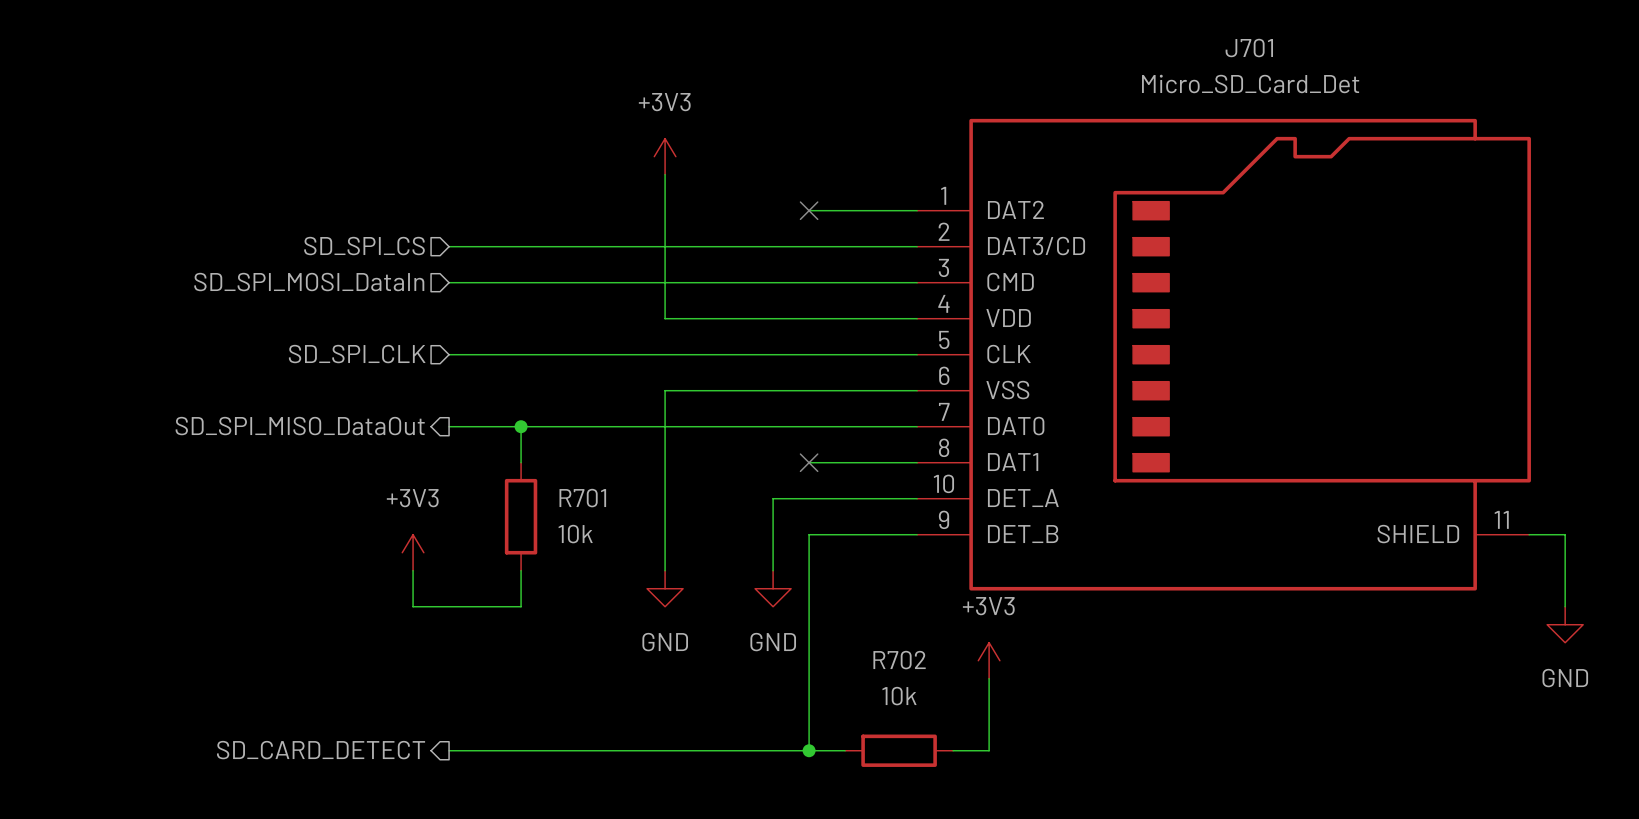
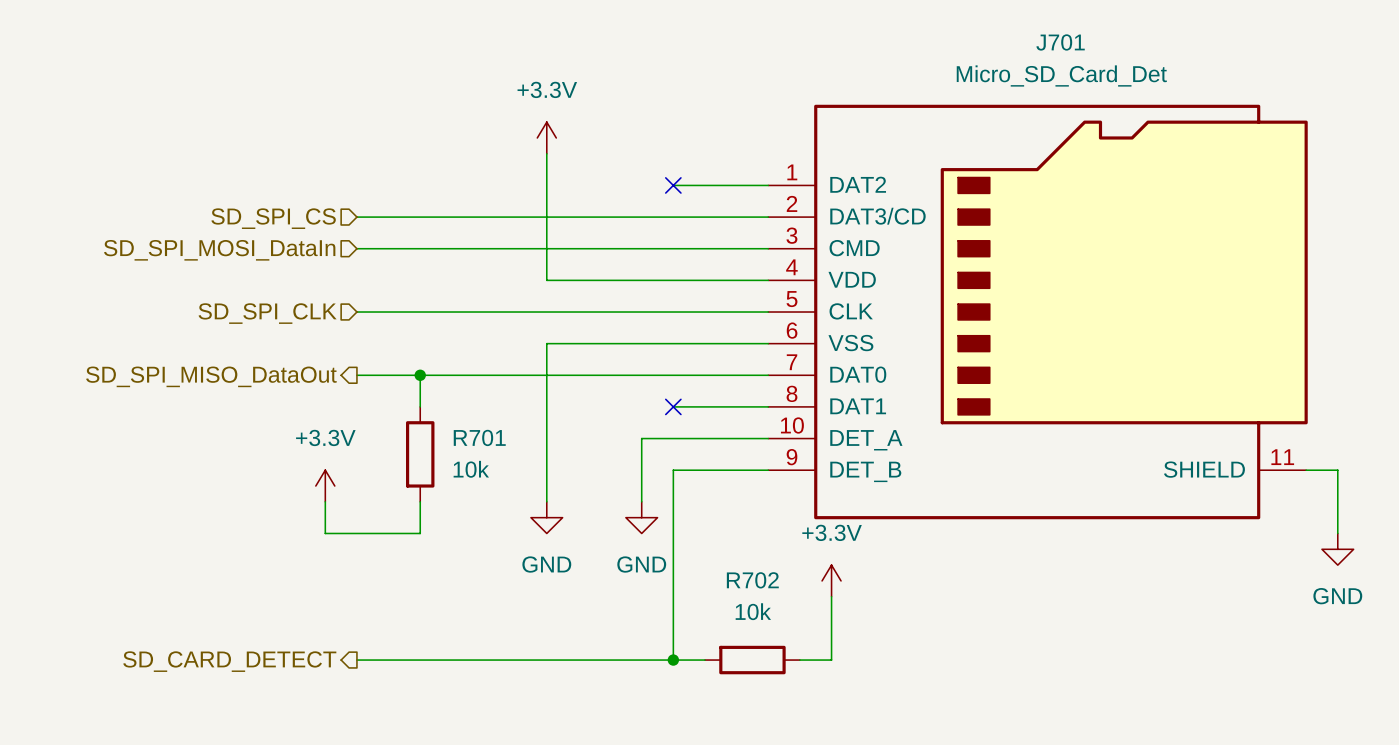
power symbol: +3V3 (665, 156) -> +3.3V (546, 137)
power symbol: +3V3 (413, 552) -> +3.3V (325, 486)
power symbol: +3V3 (989, 660) -> +3.3V (831, 580)

